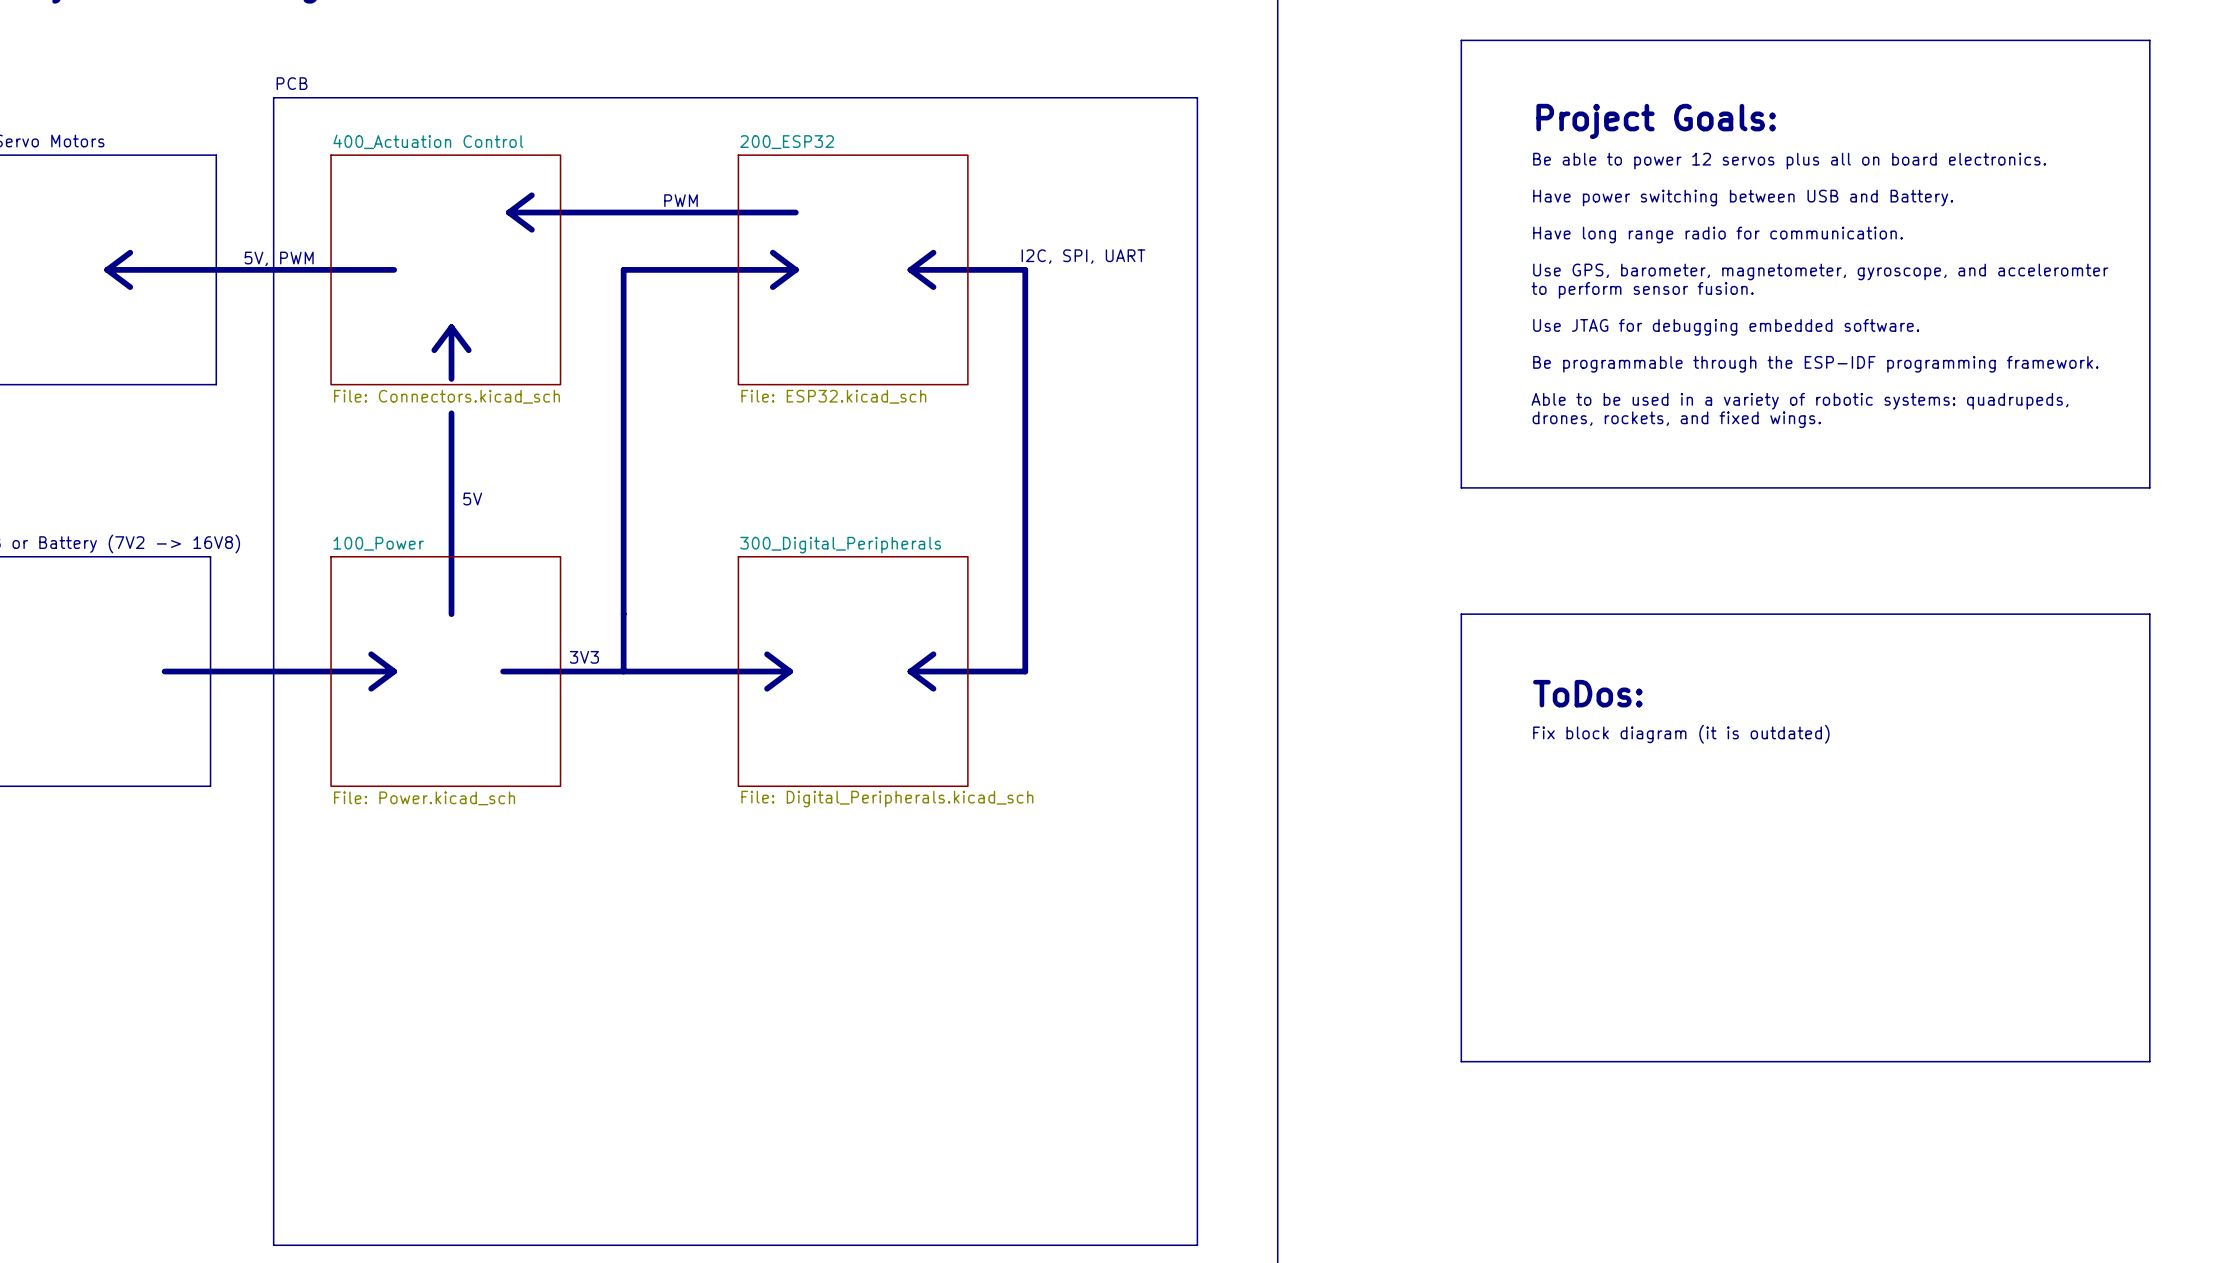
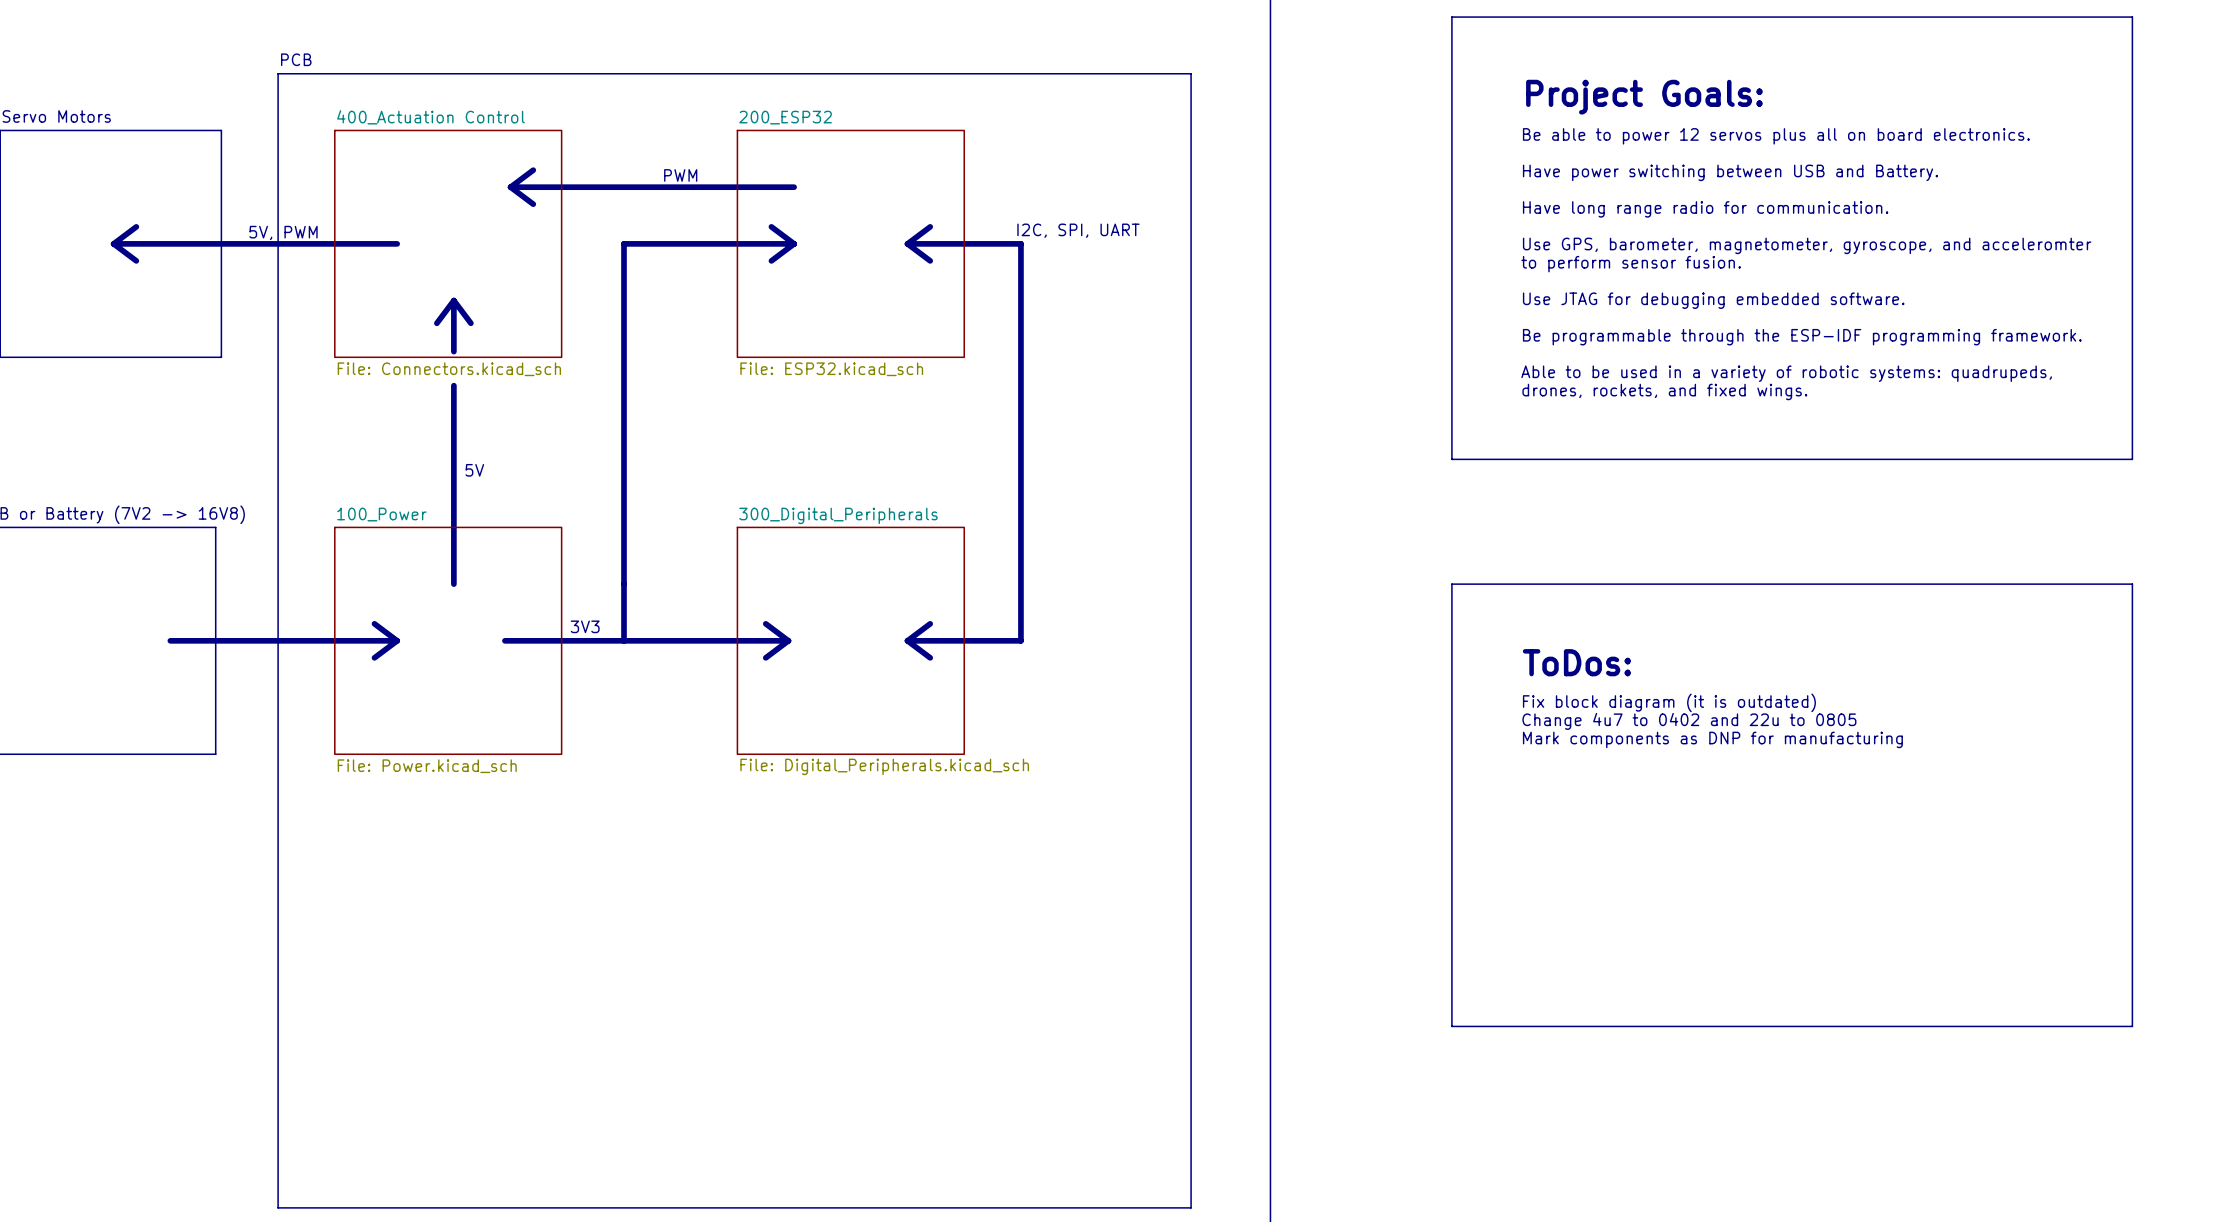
text: none -> Change 4u7 to 0402 and 22u to 0805 (1689, 721)
text: none -> Mark components as DNP for manufacturing (1712, 739)

